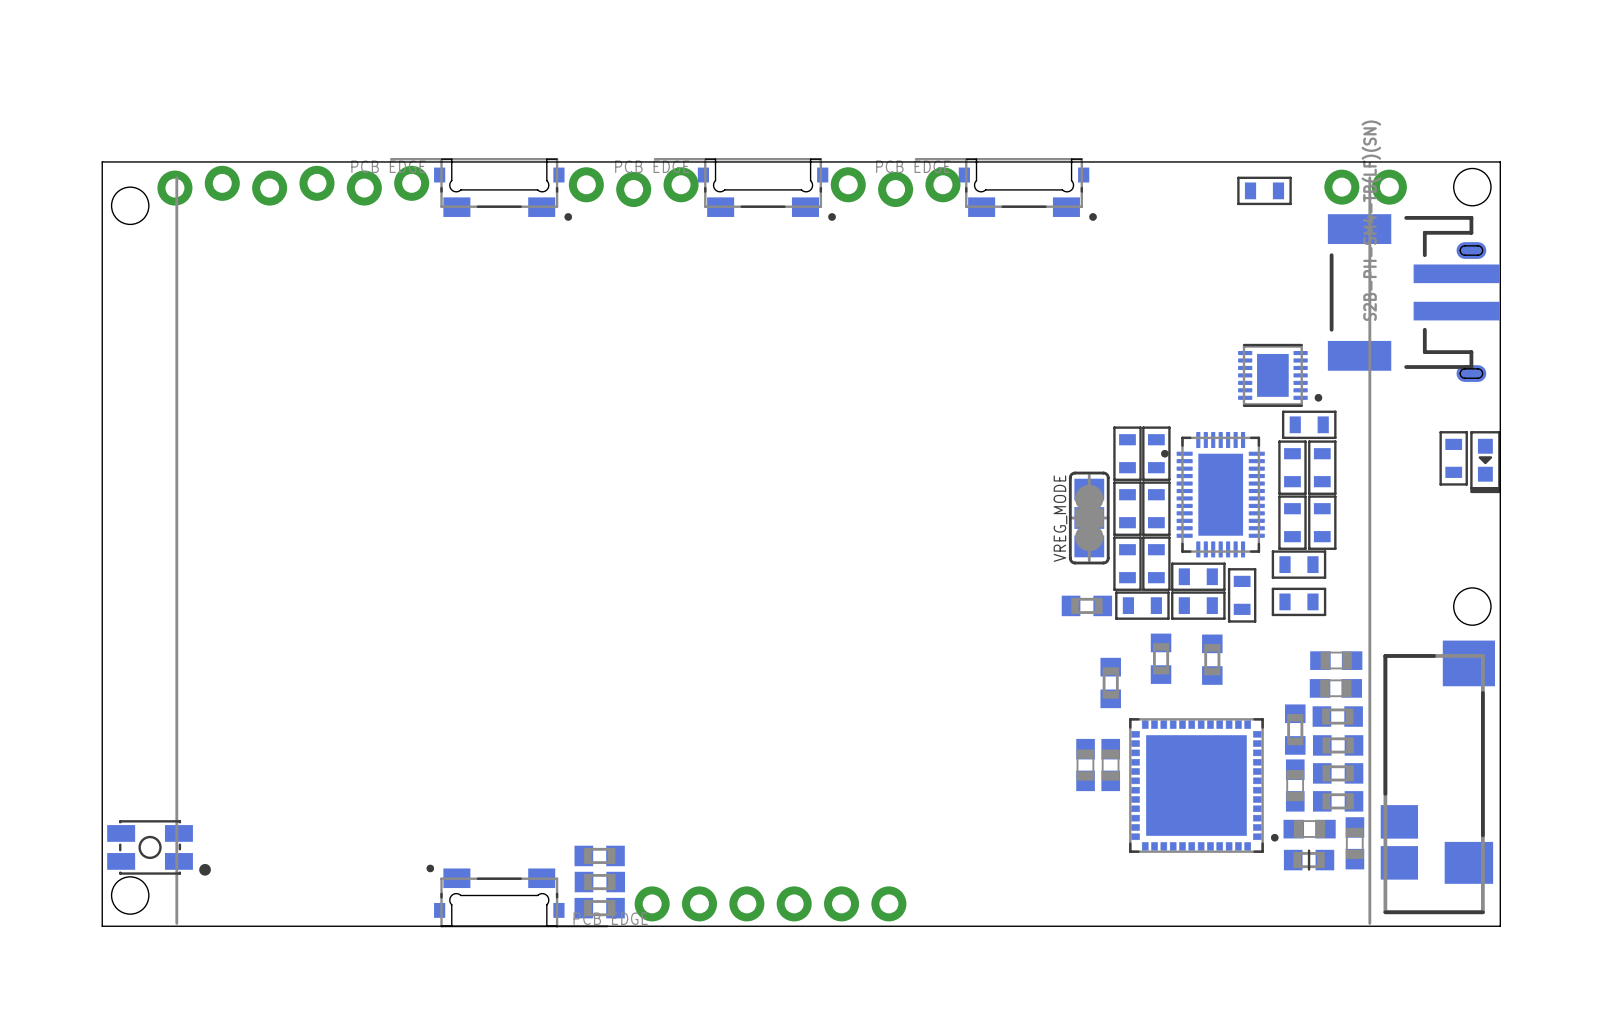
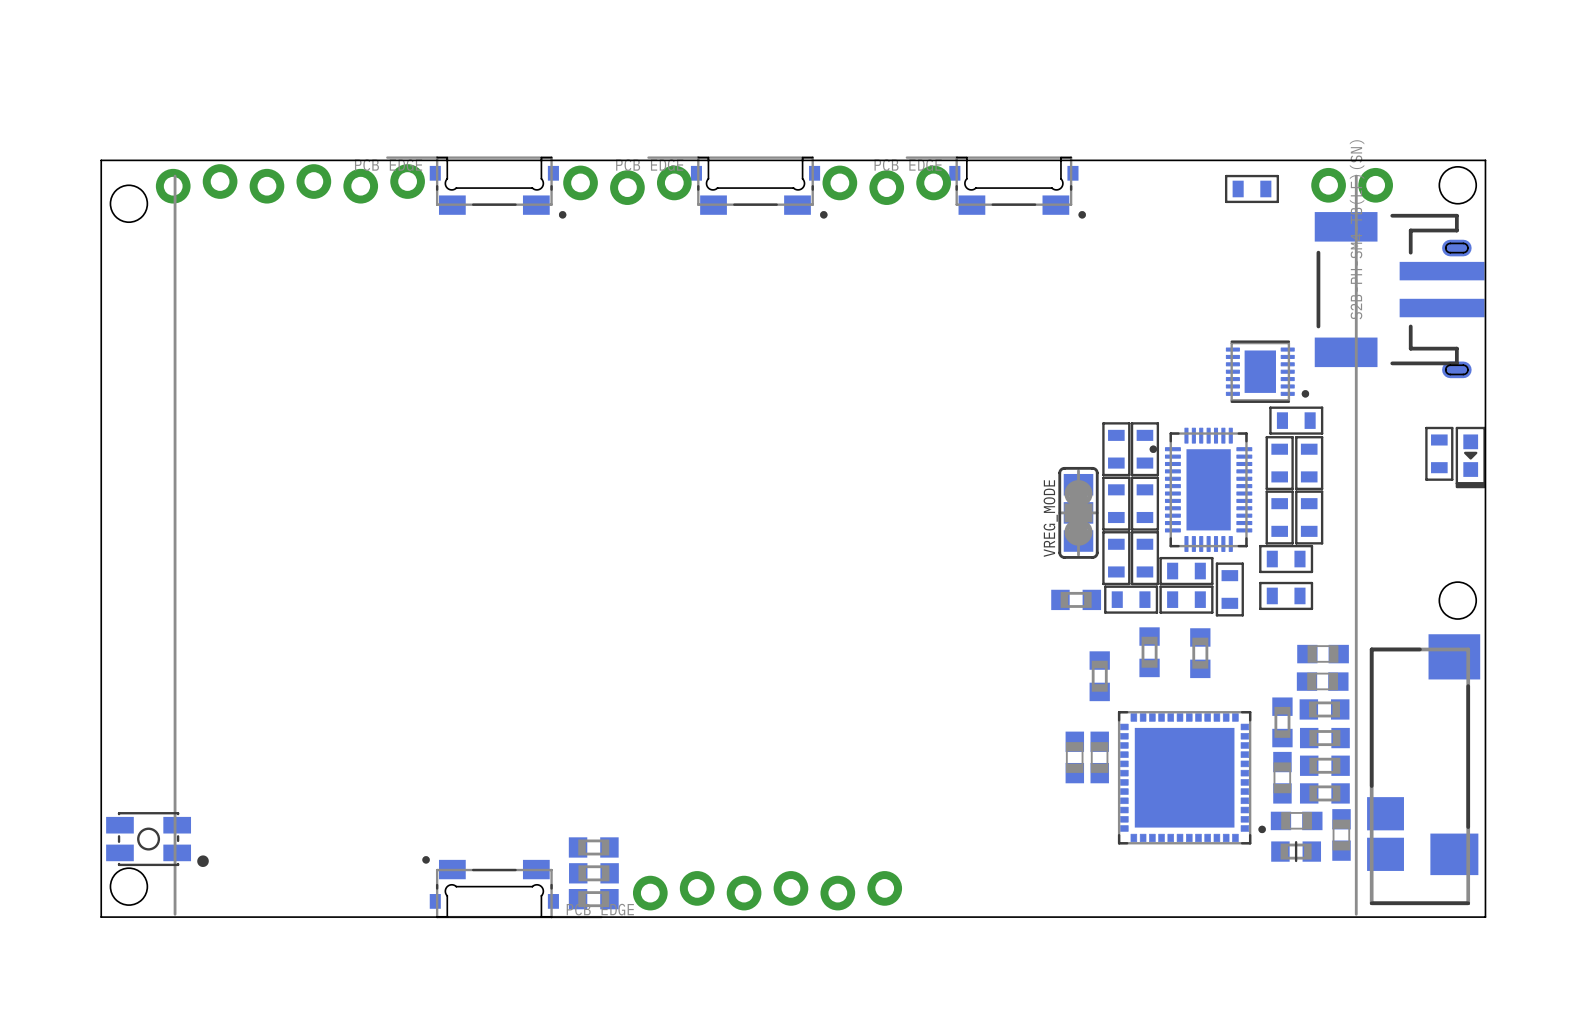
part footprint: [634, 886, 907, 922] -> [632, 871, 903, 911]

